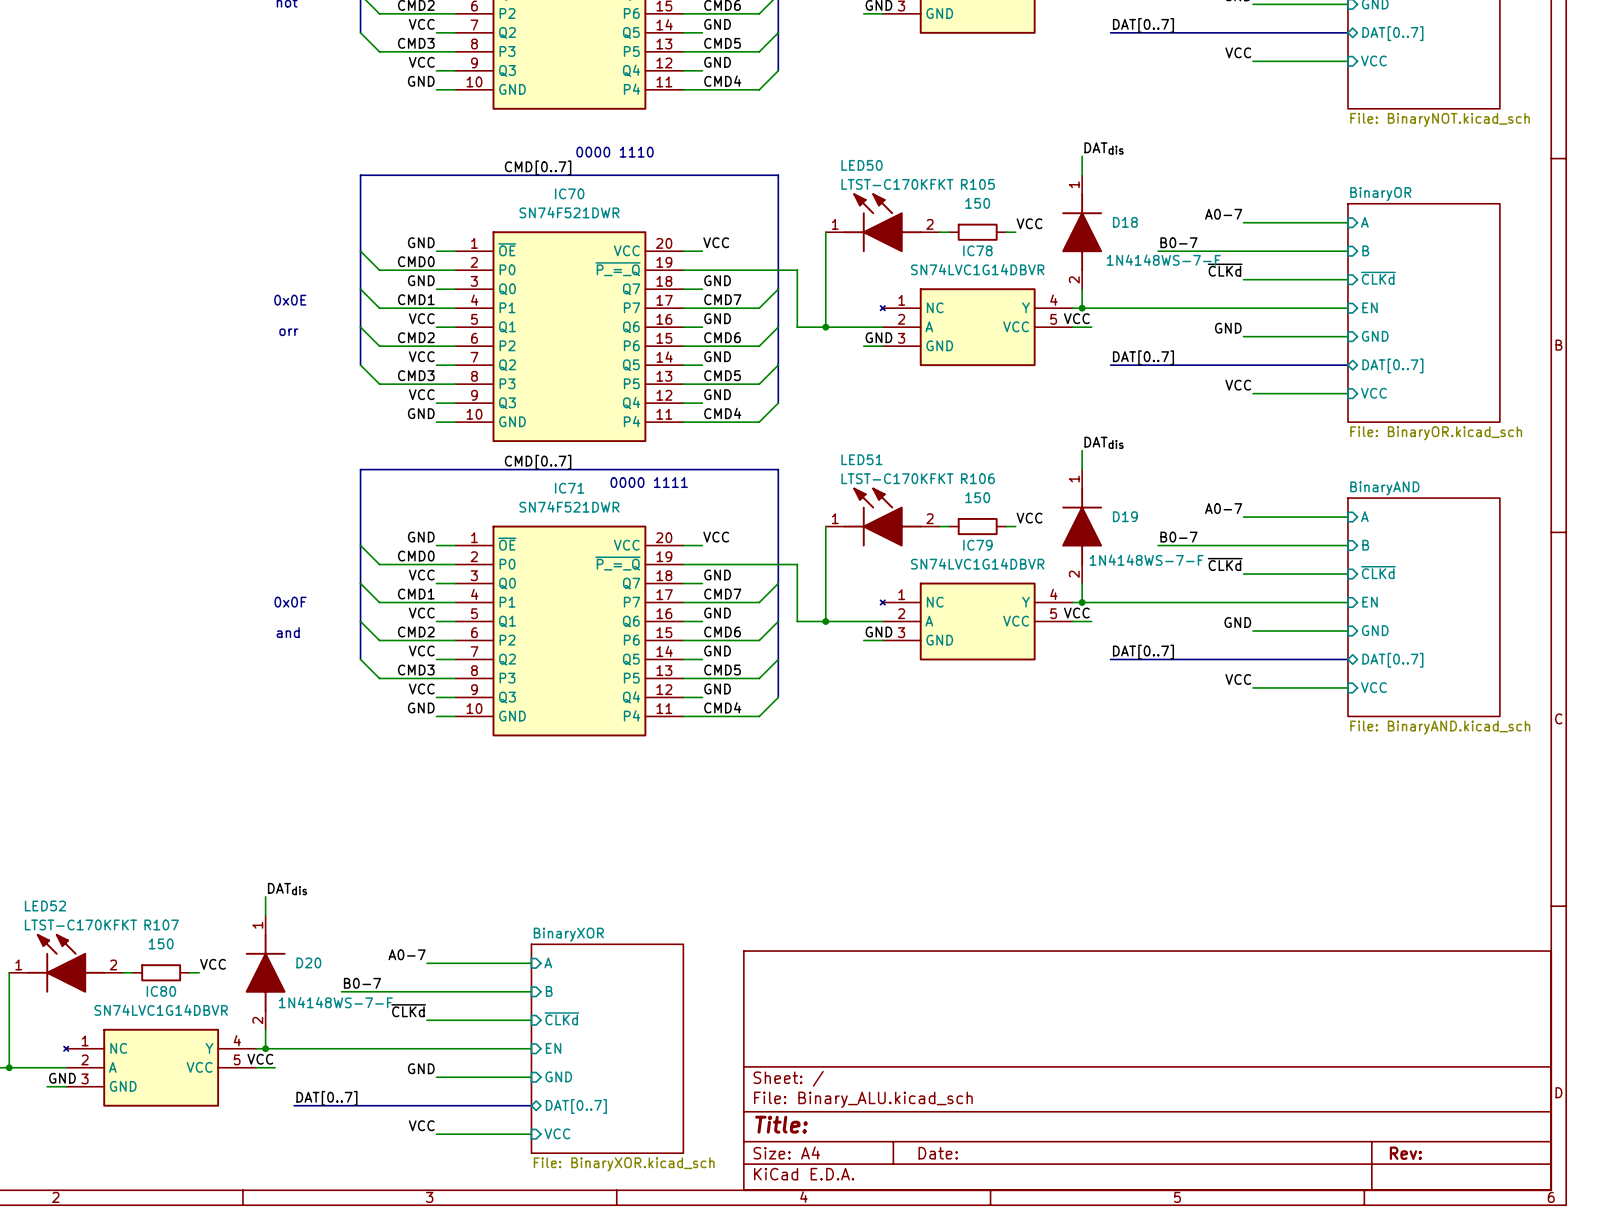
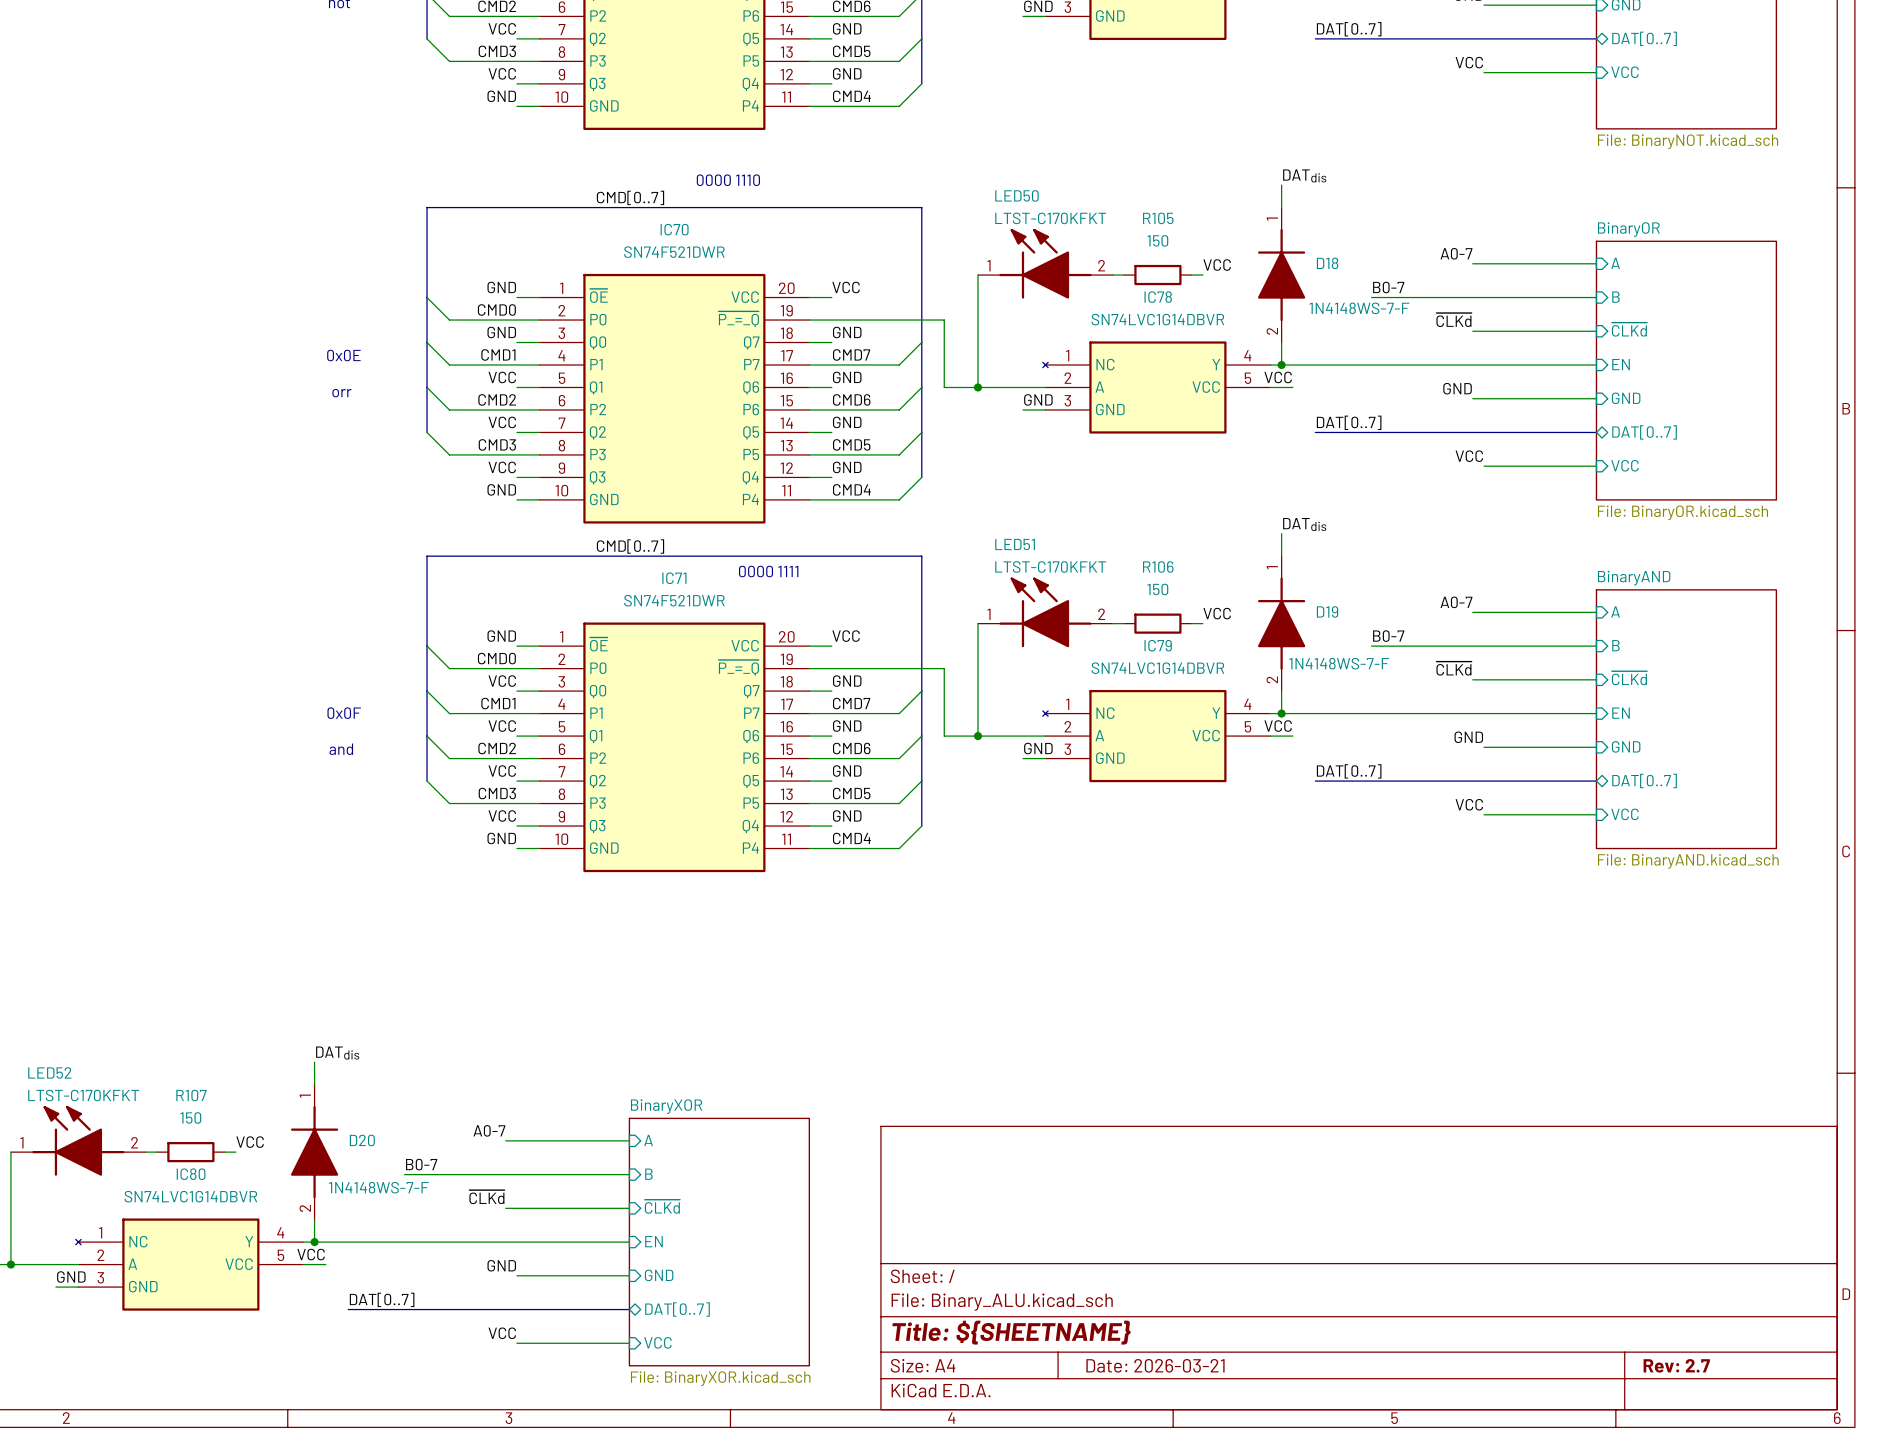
title block: Title: (781, 1124) -> Title: ${SHEETNAME} (1011, 1332)
title block: Date: (938, 1153) -> Date: 2026-03-21 (1155, 1365)
title block: Rev: (1405, 1153) -> Rev: 2.7 (1676, 1365)

